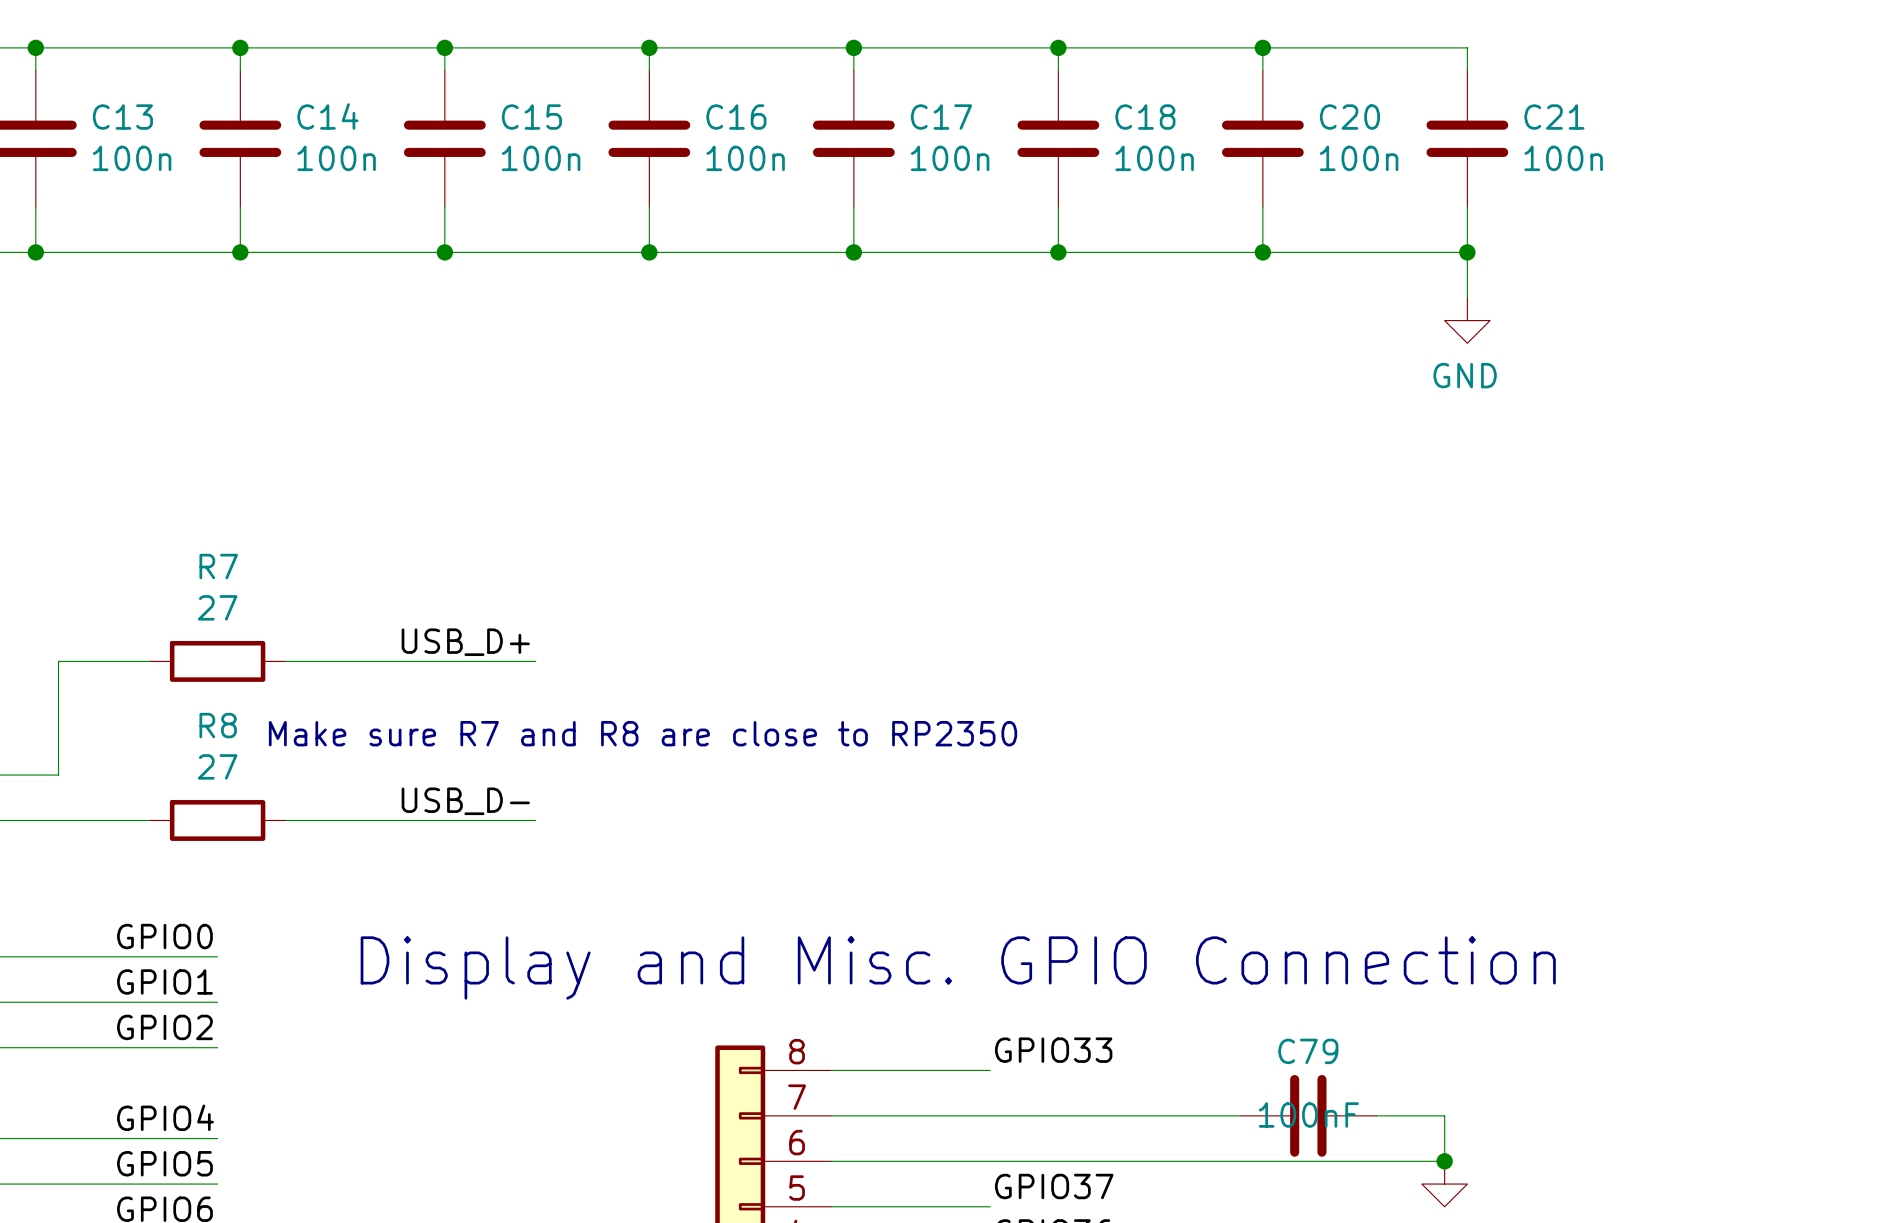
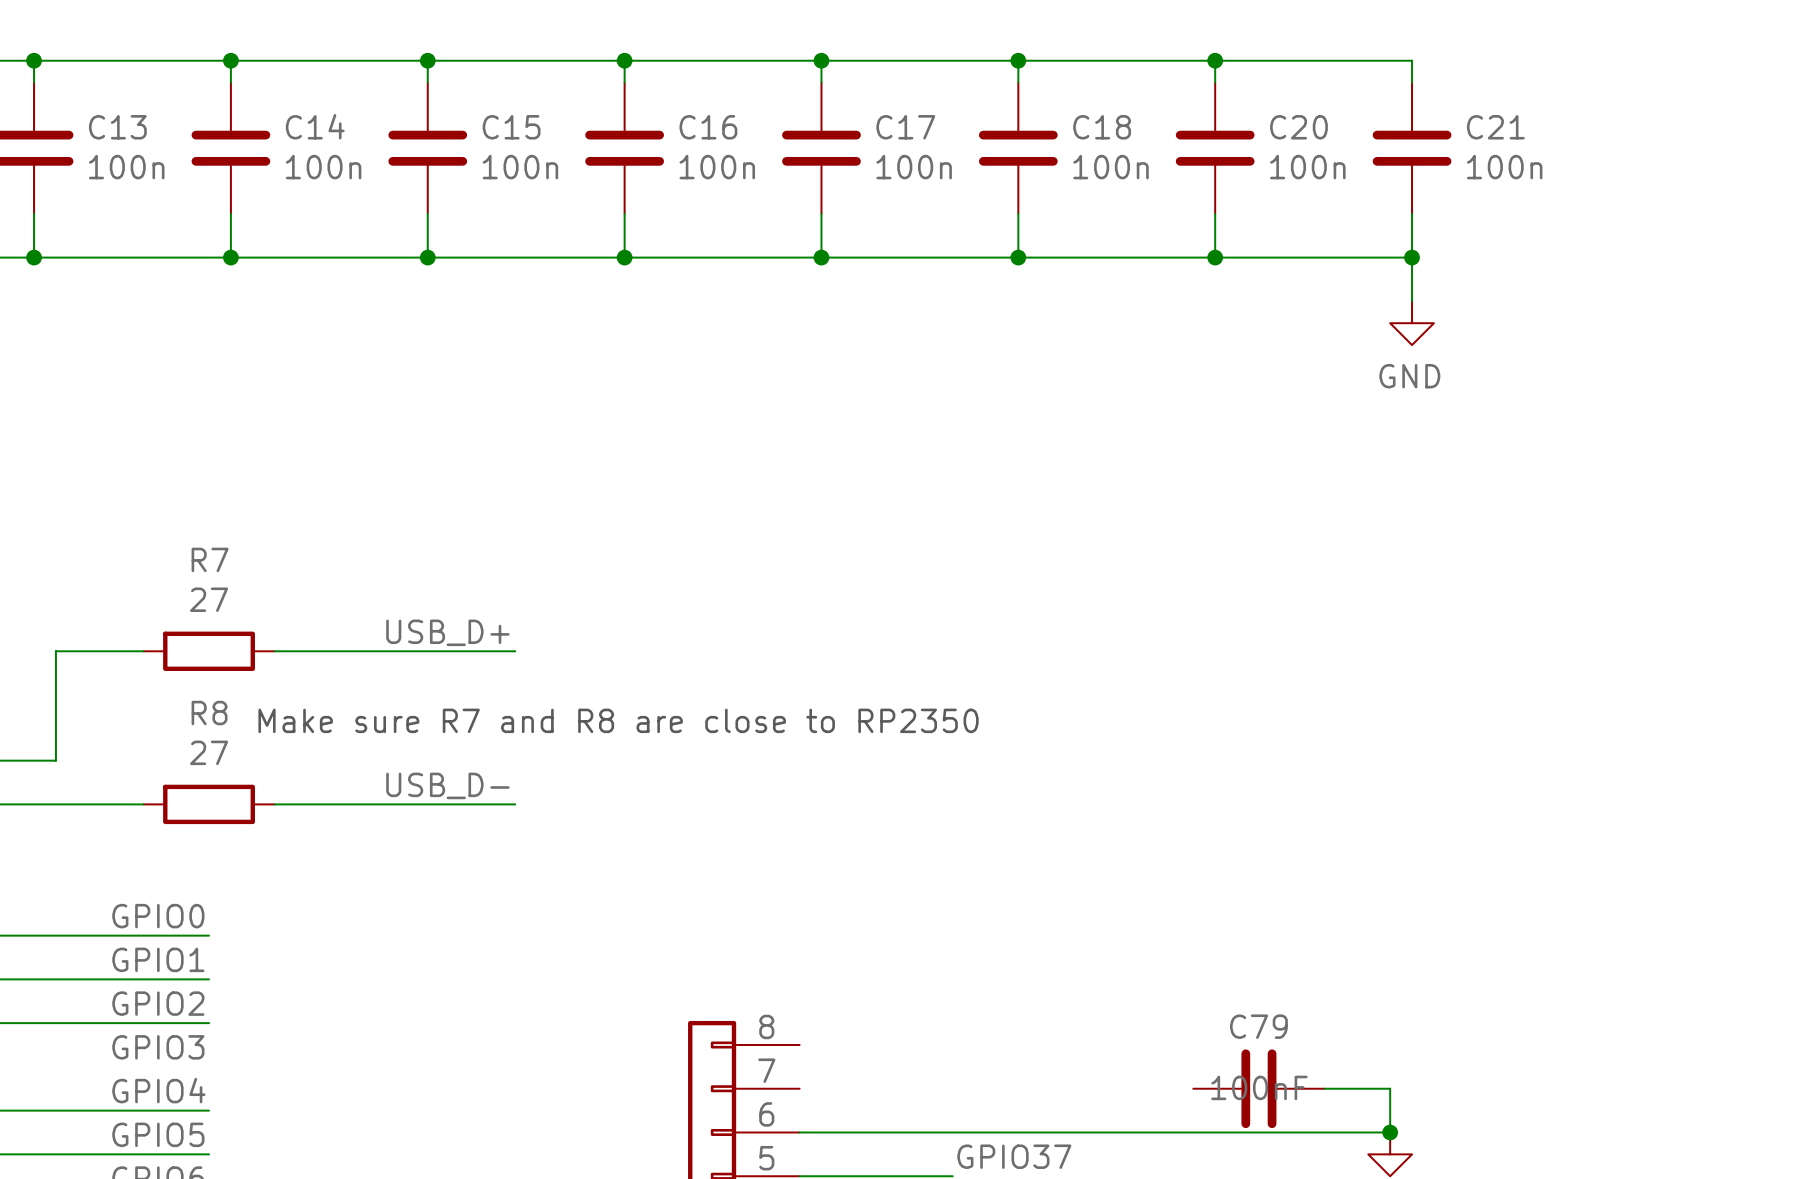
text: Display and Misc. GPIO Connection (958, 967) -> none
label: GPIO33 (1053, 1050) -> none
wire: (831, 1070) (990, 1070) -> none
label: none -> GPIO3 (158, 1047)
wire: (831, 1115) (1240, 1115) -> none

